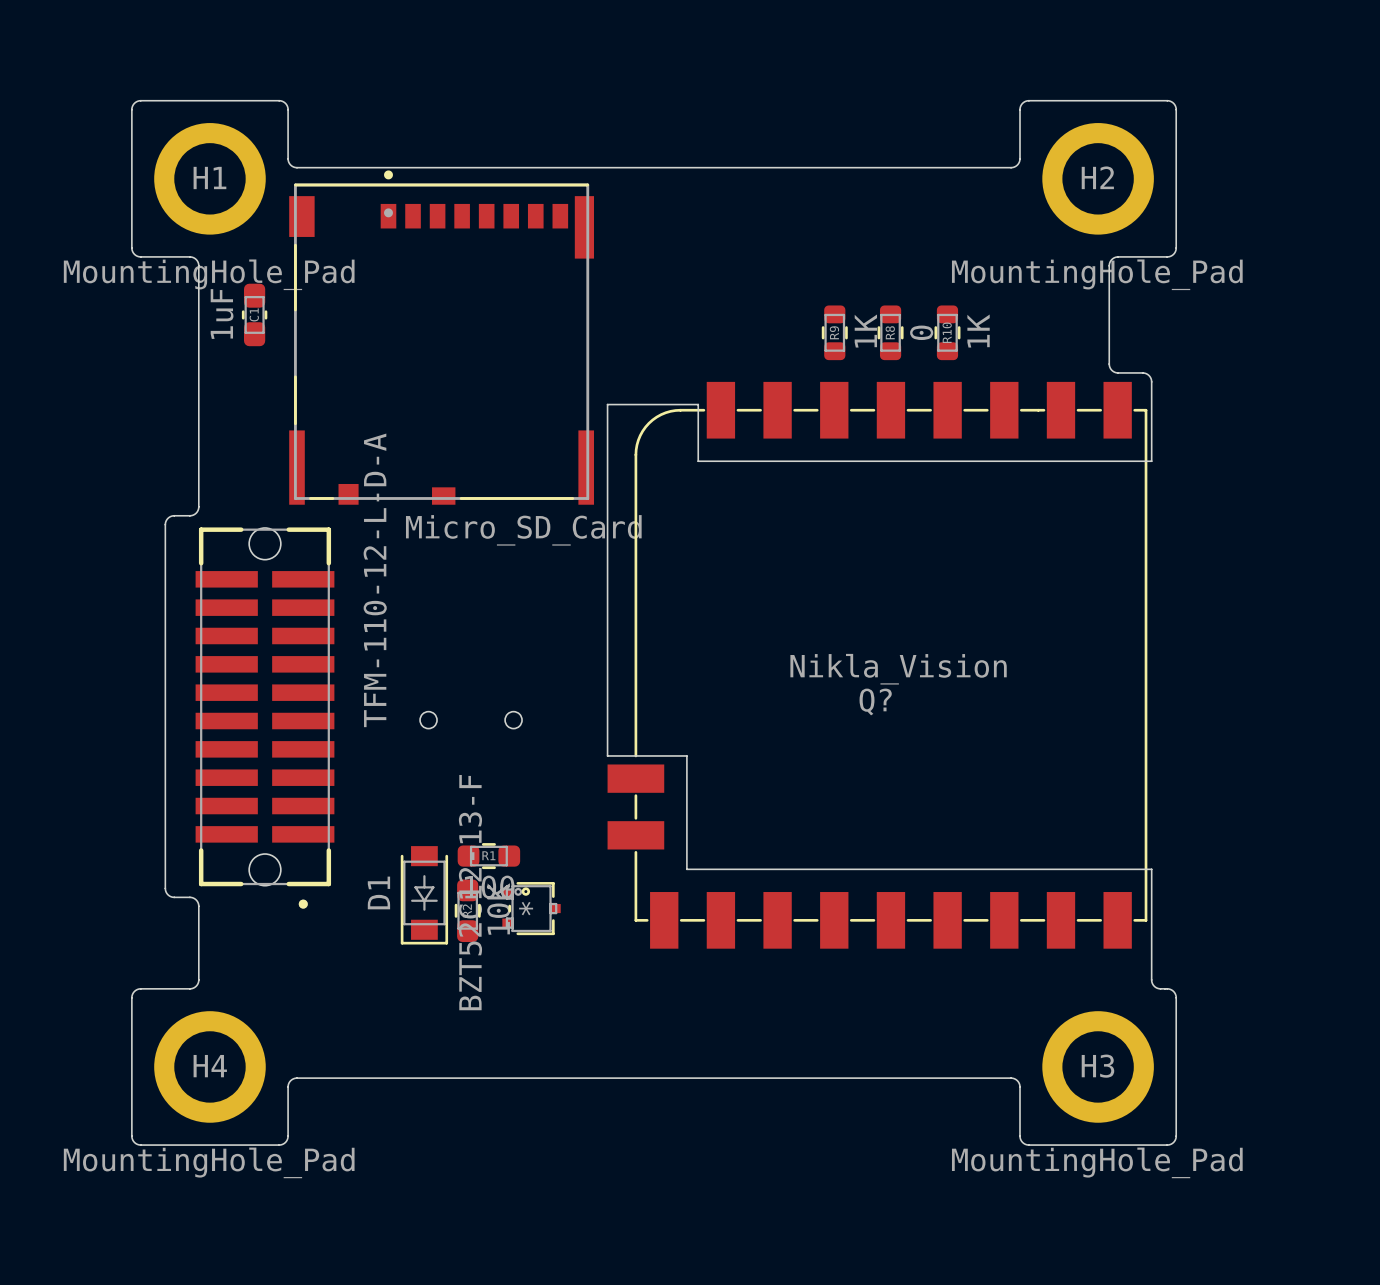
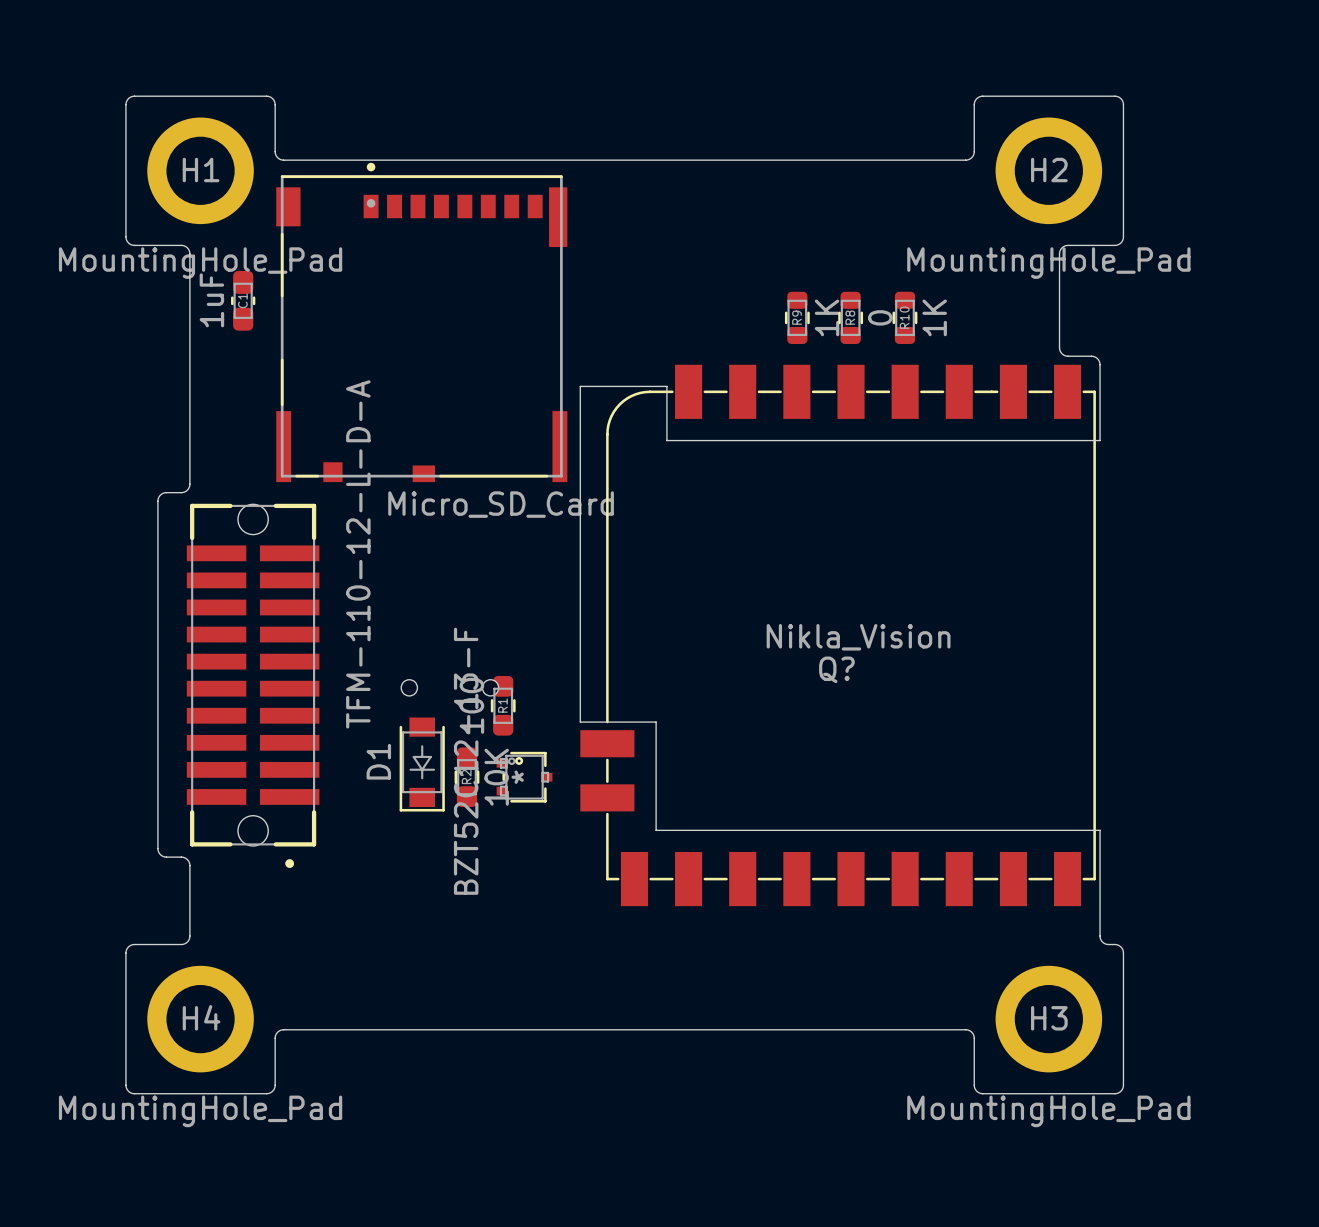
R1 rotation: 0° (488, 856) -> 90° clockwise (503, 705)
R1 position: (488, 856) -> (503, 705)
D1 position: (424, 895) -> (422, 764)
part position: (531, 908) -> (524, 777)
R2 position: (467, 910) -> (466, 777)

